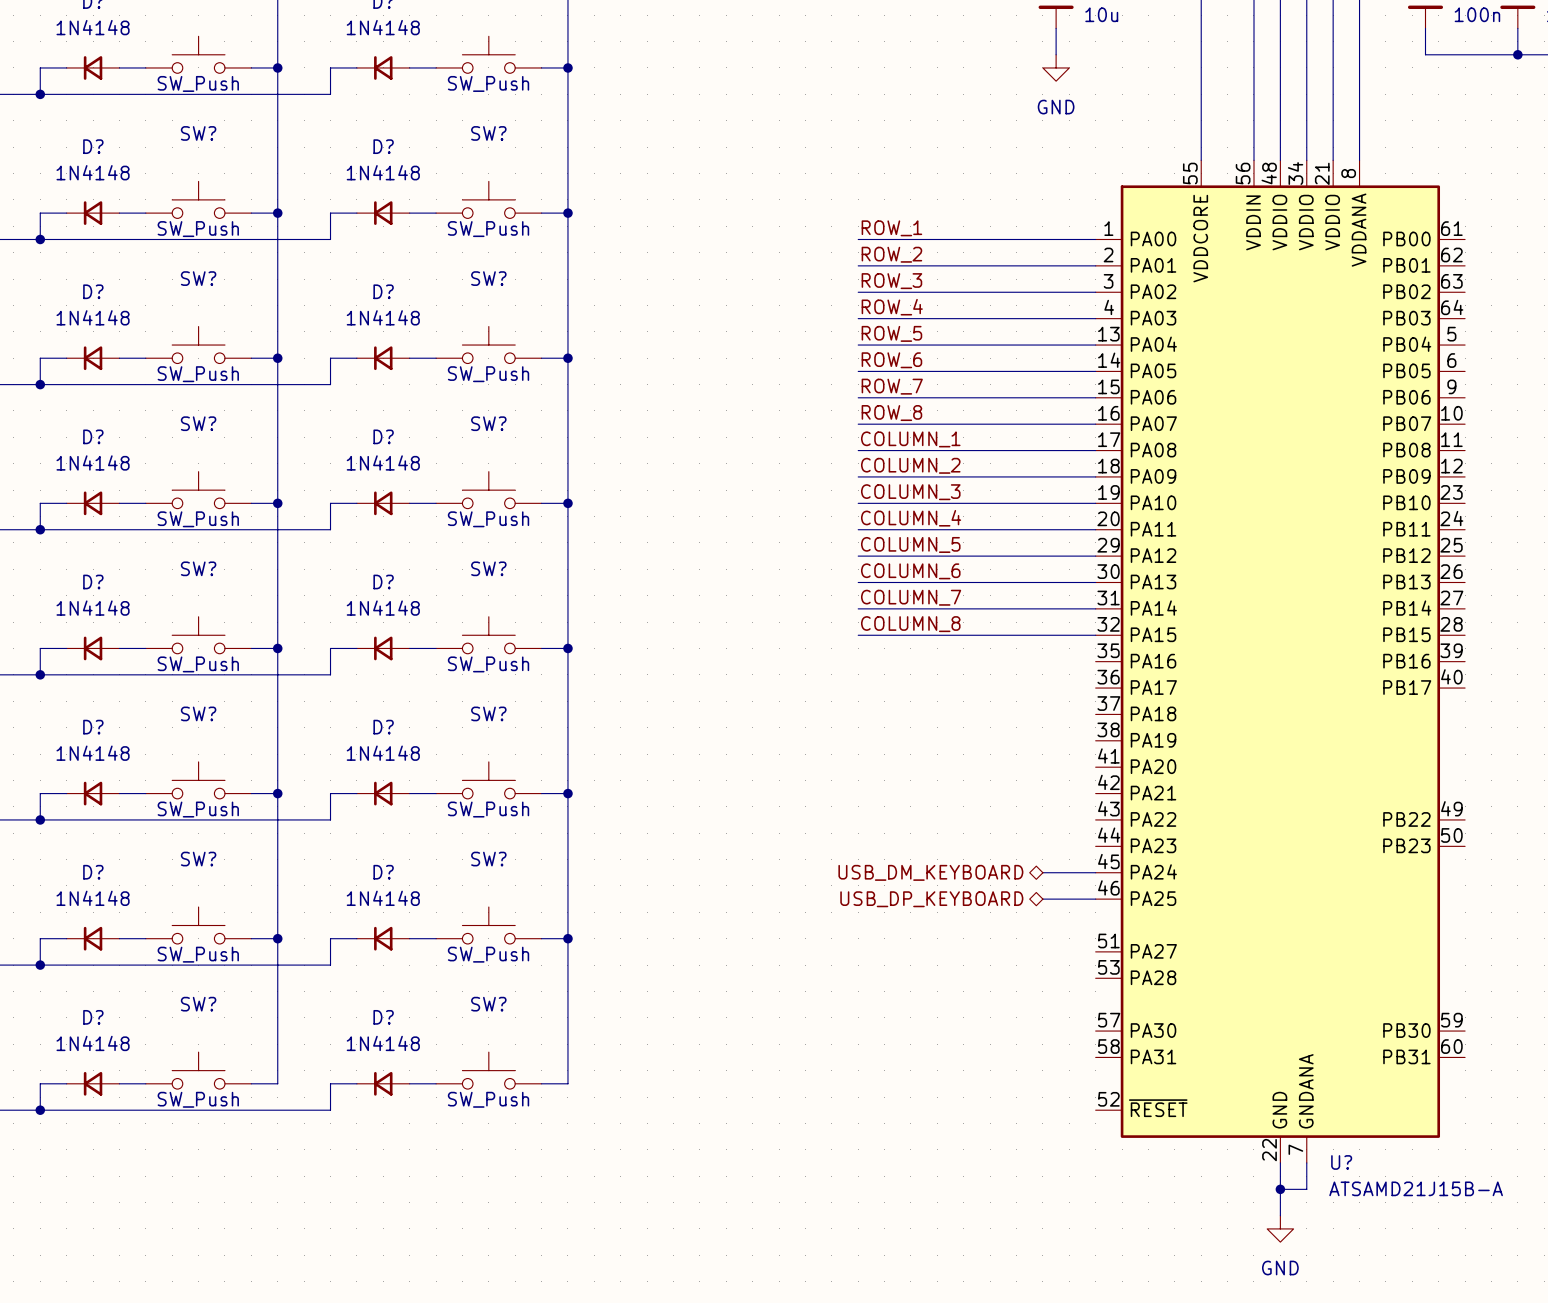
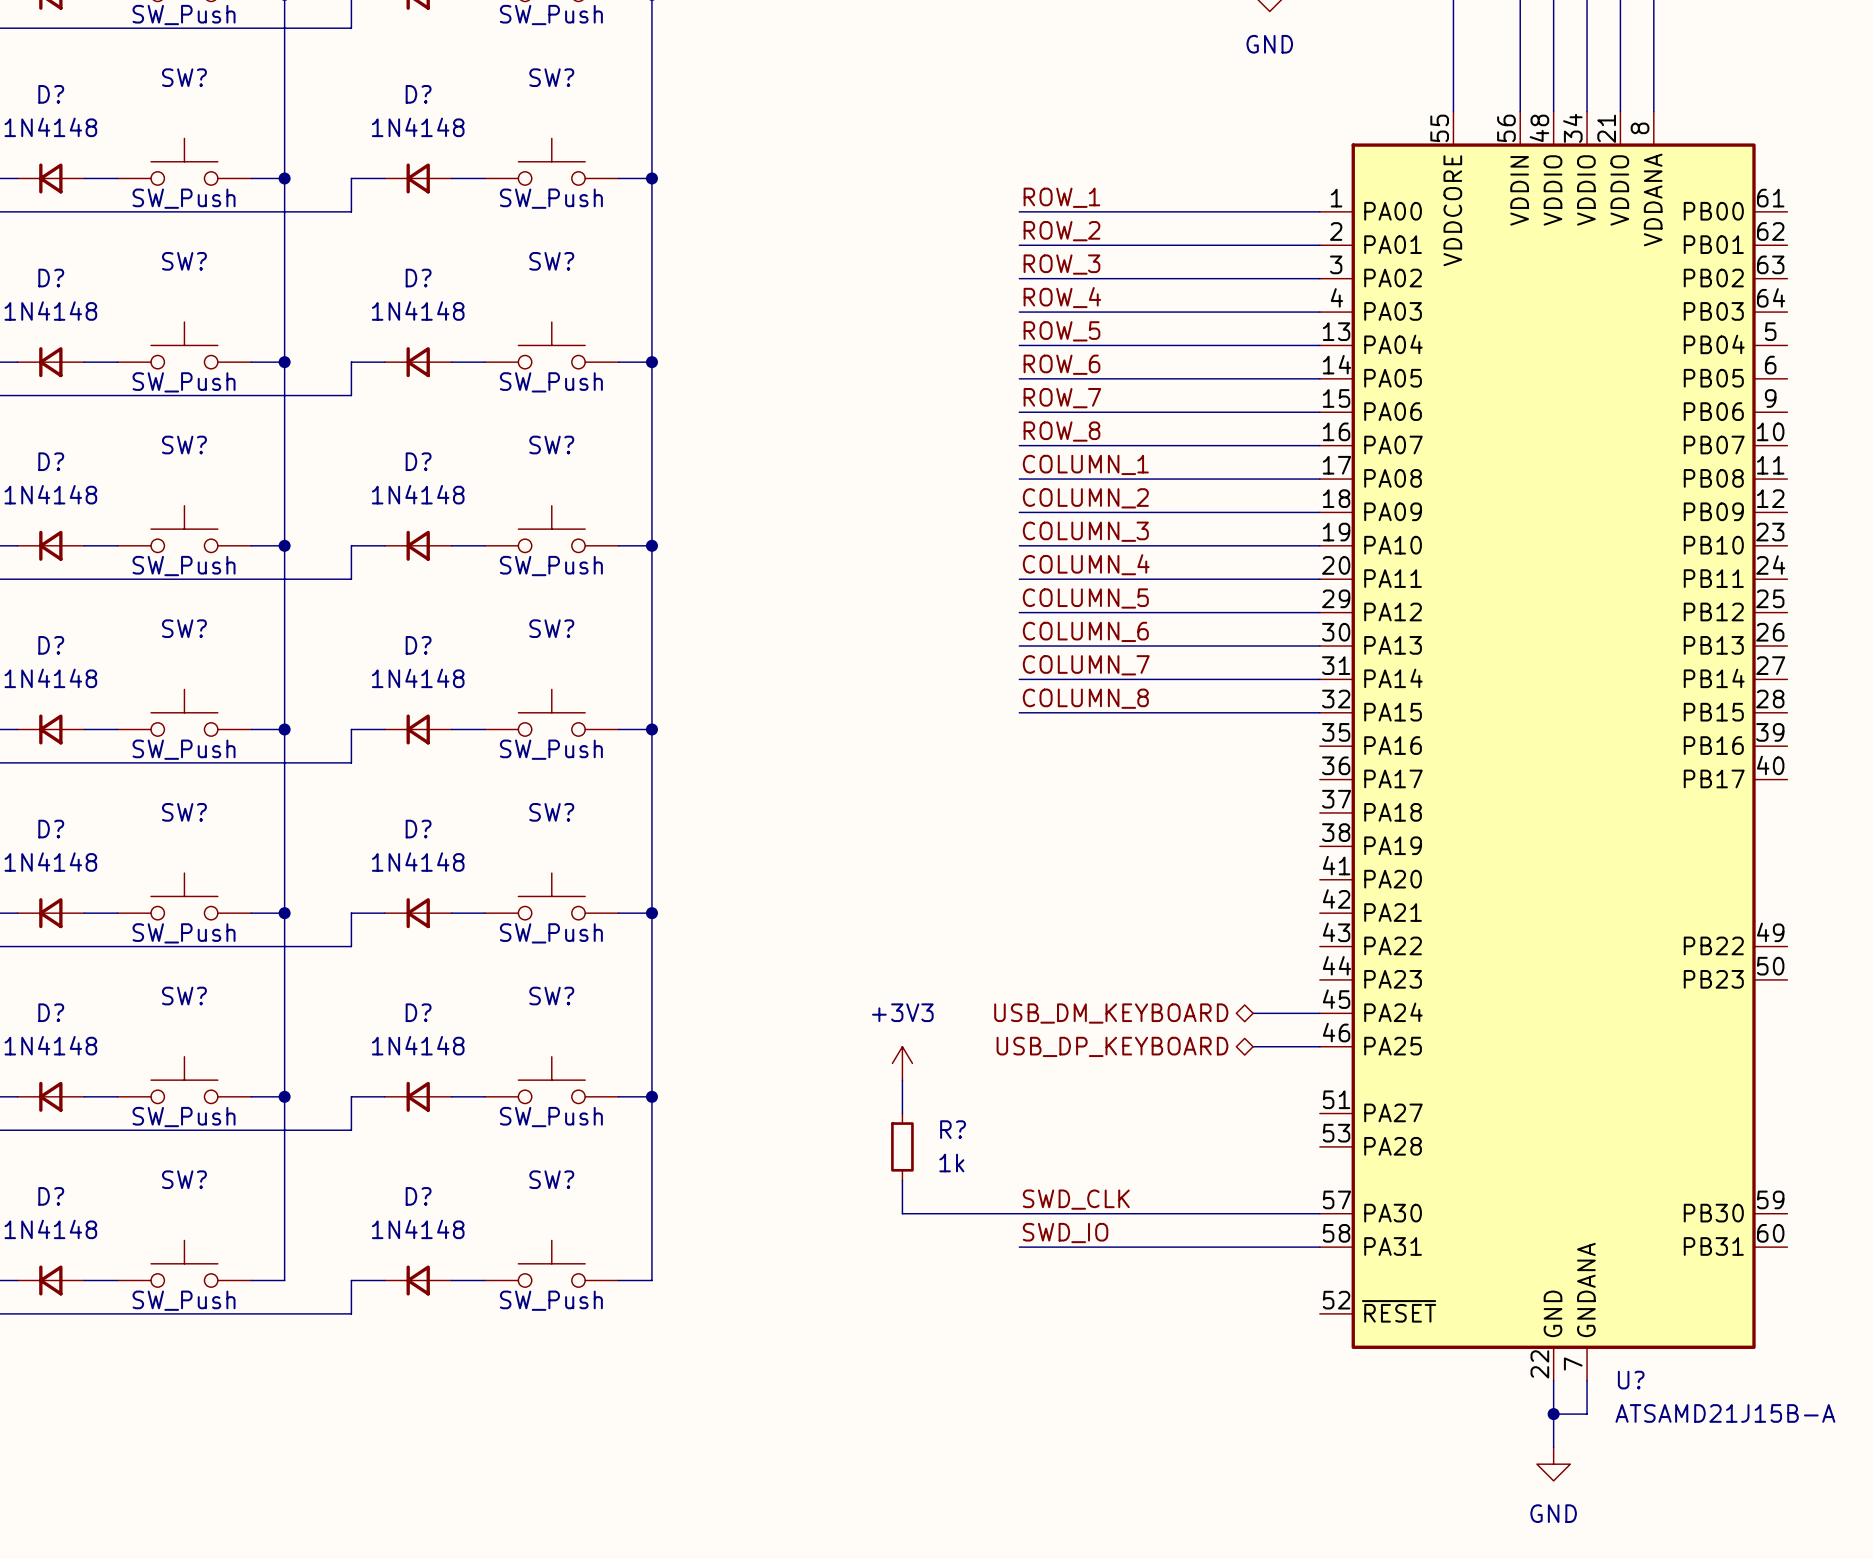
power symbol: none -> +3V3 (902, 1063)
wire: none -> (902, 1080) (902, 1113)
R?: none -> 1k (902, 1146)
wire: none -> (902, 1180) (902, 1213) (1319, 1213)
label: none -> SWD_CLK (1076, 1199)
label: none -> SWD_IO (1065, 1233)
wire: none -> (1019, 1247) (1319, 1247)

